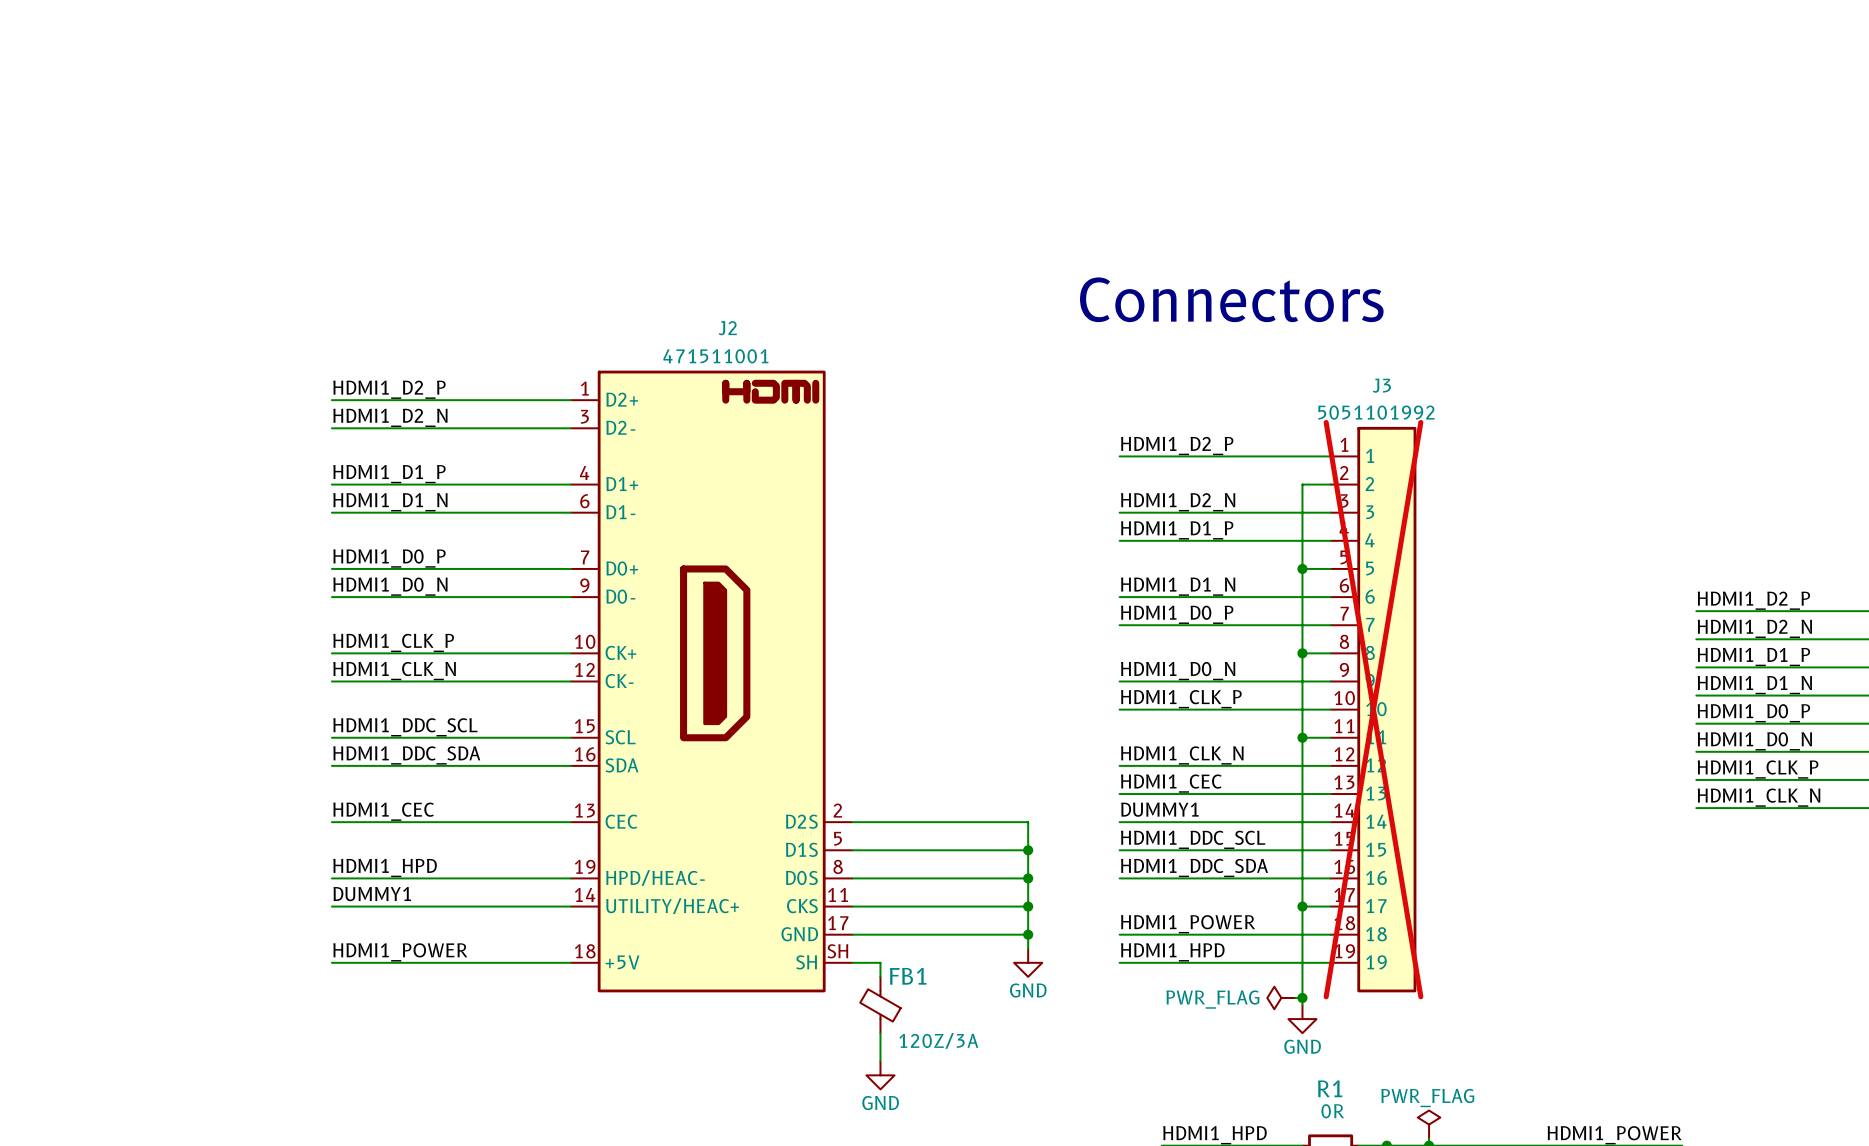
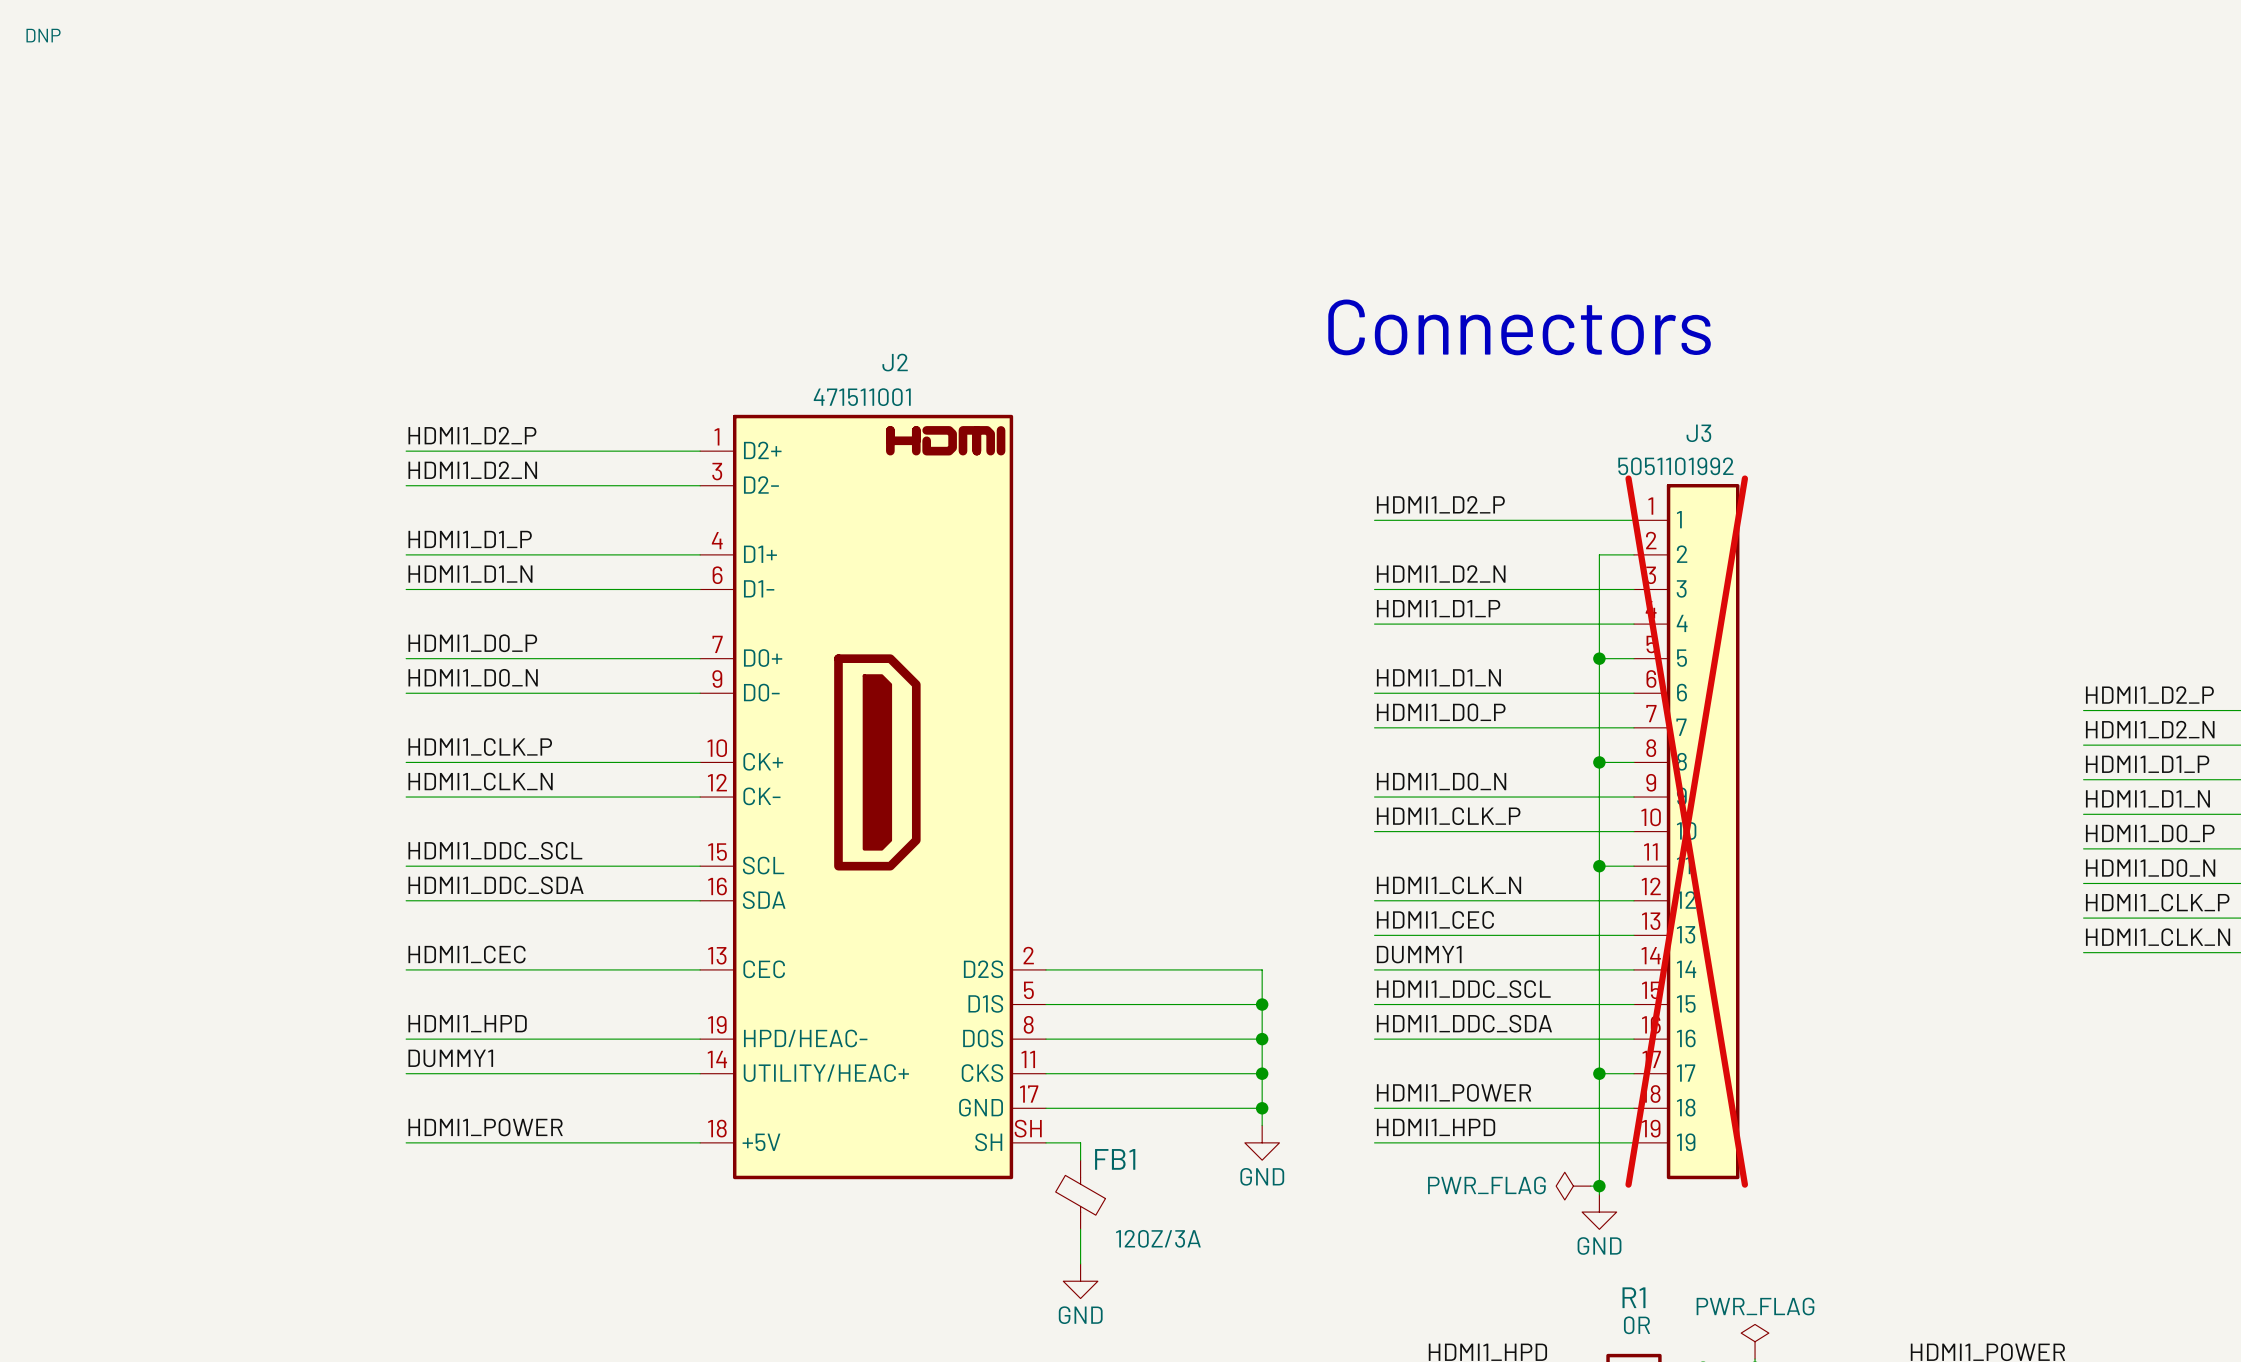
J3 text: none -> DNP (43, 35)

